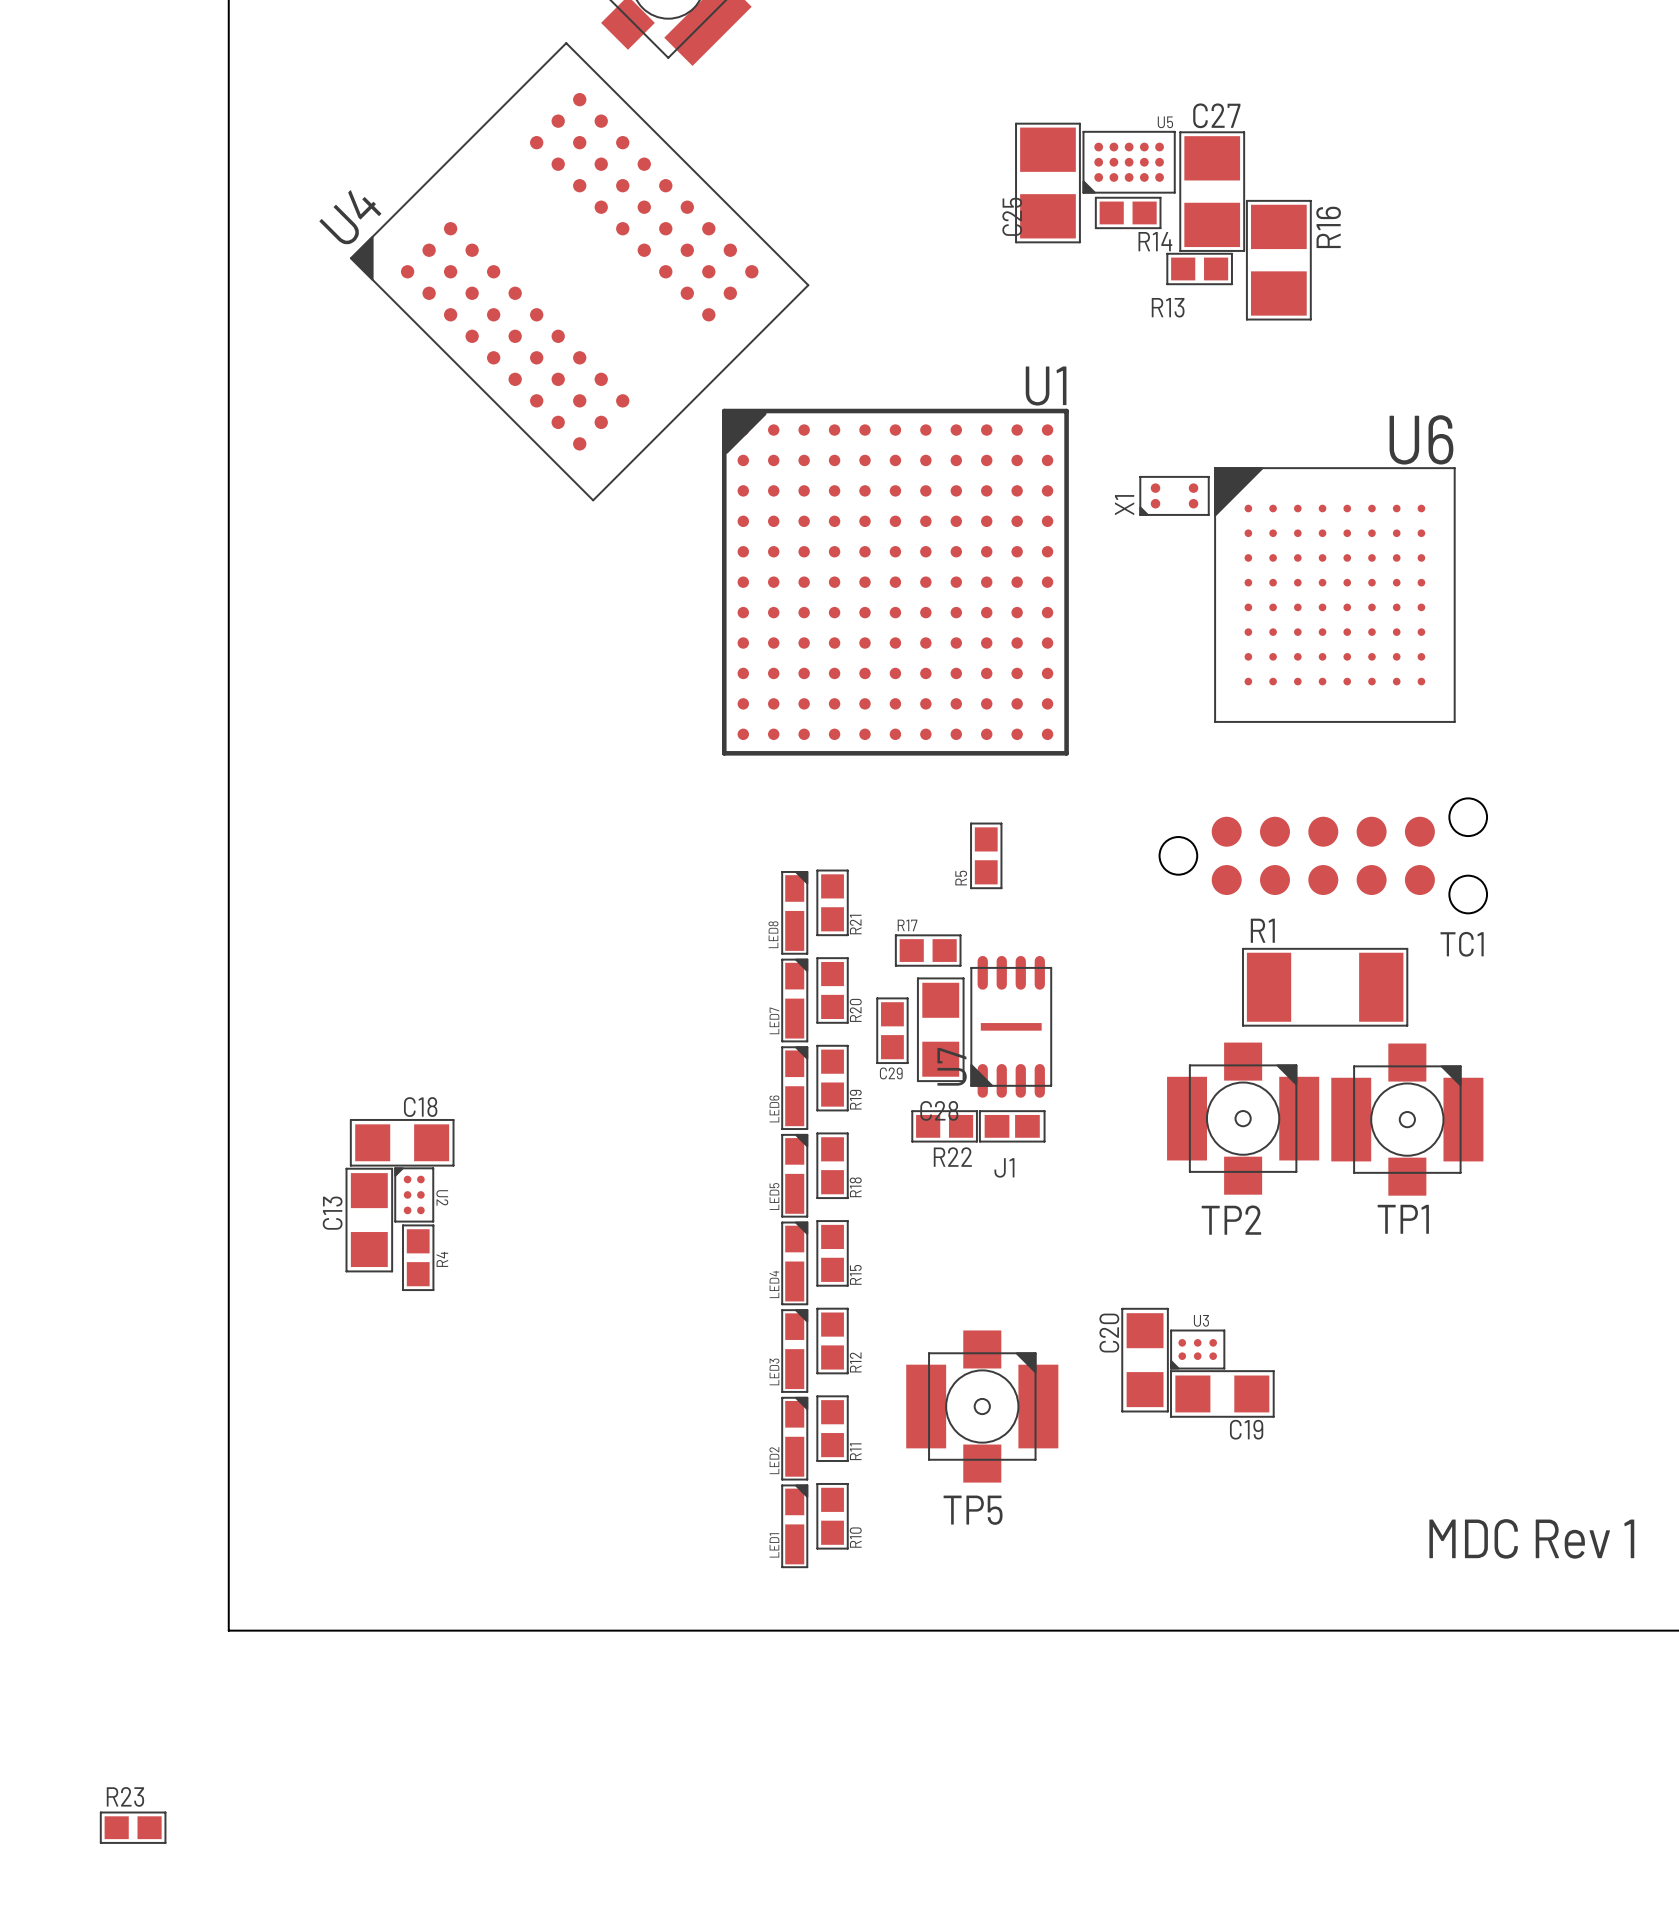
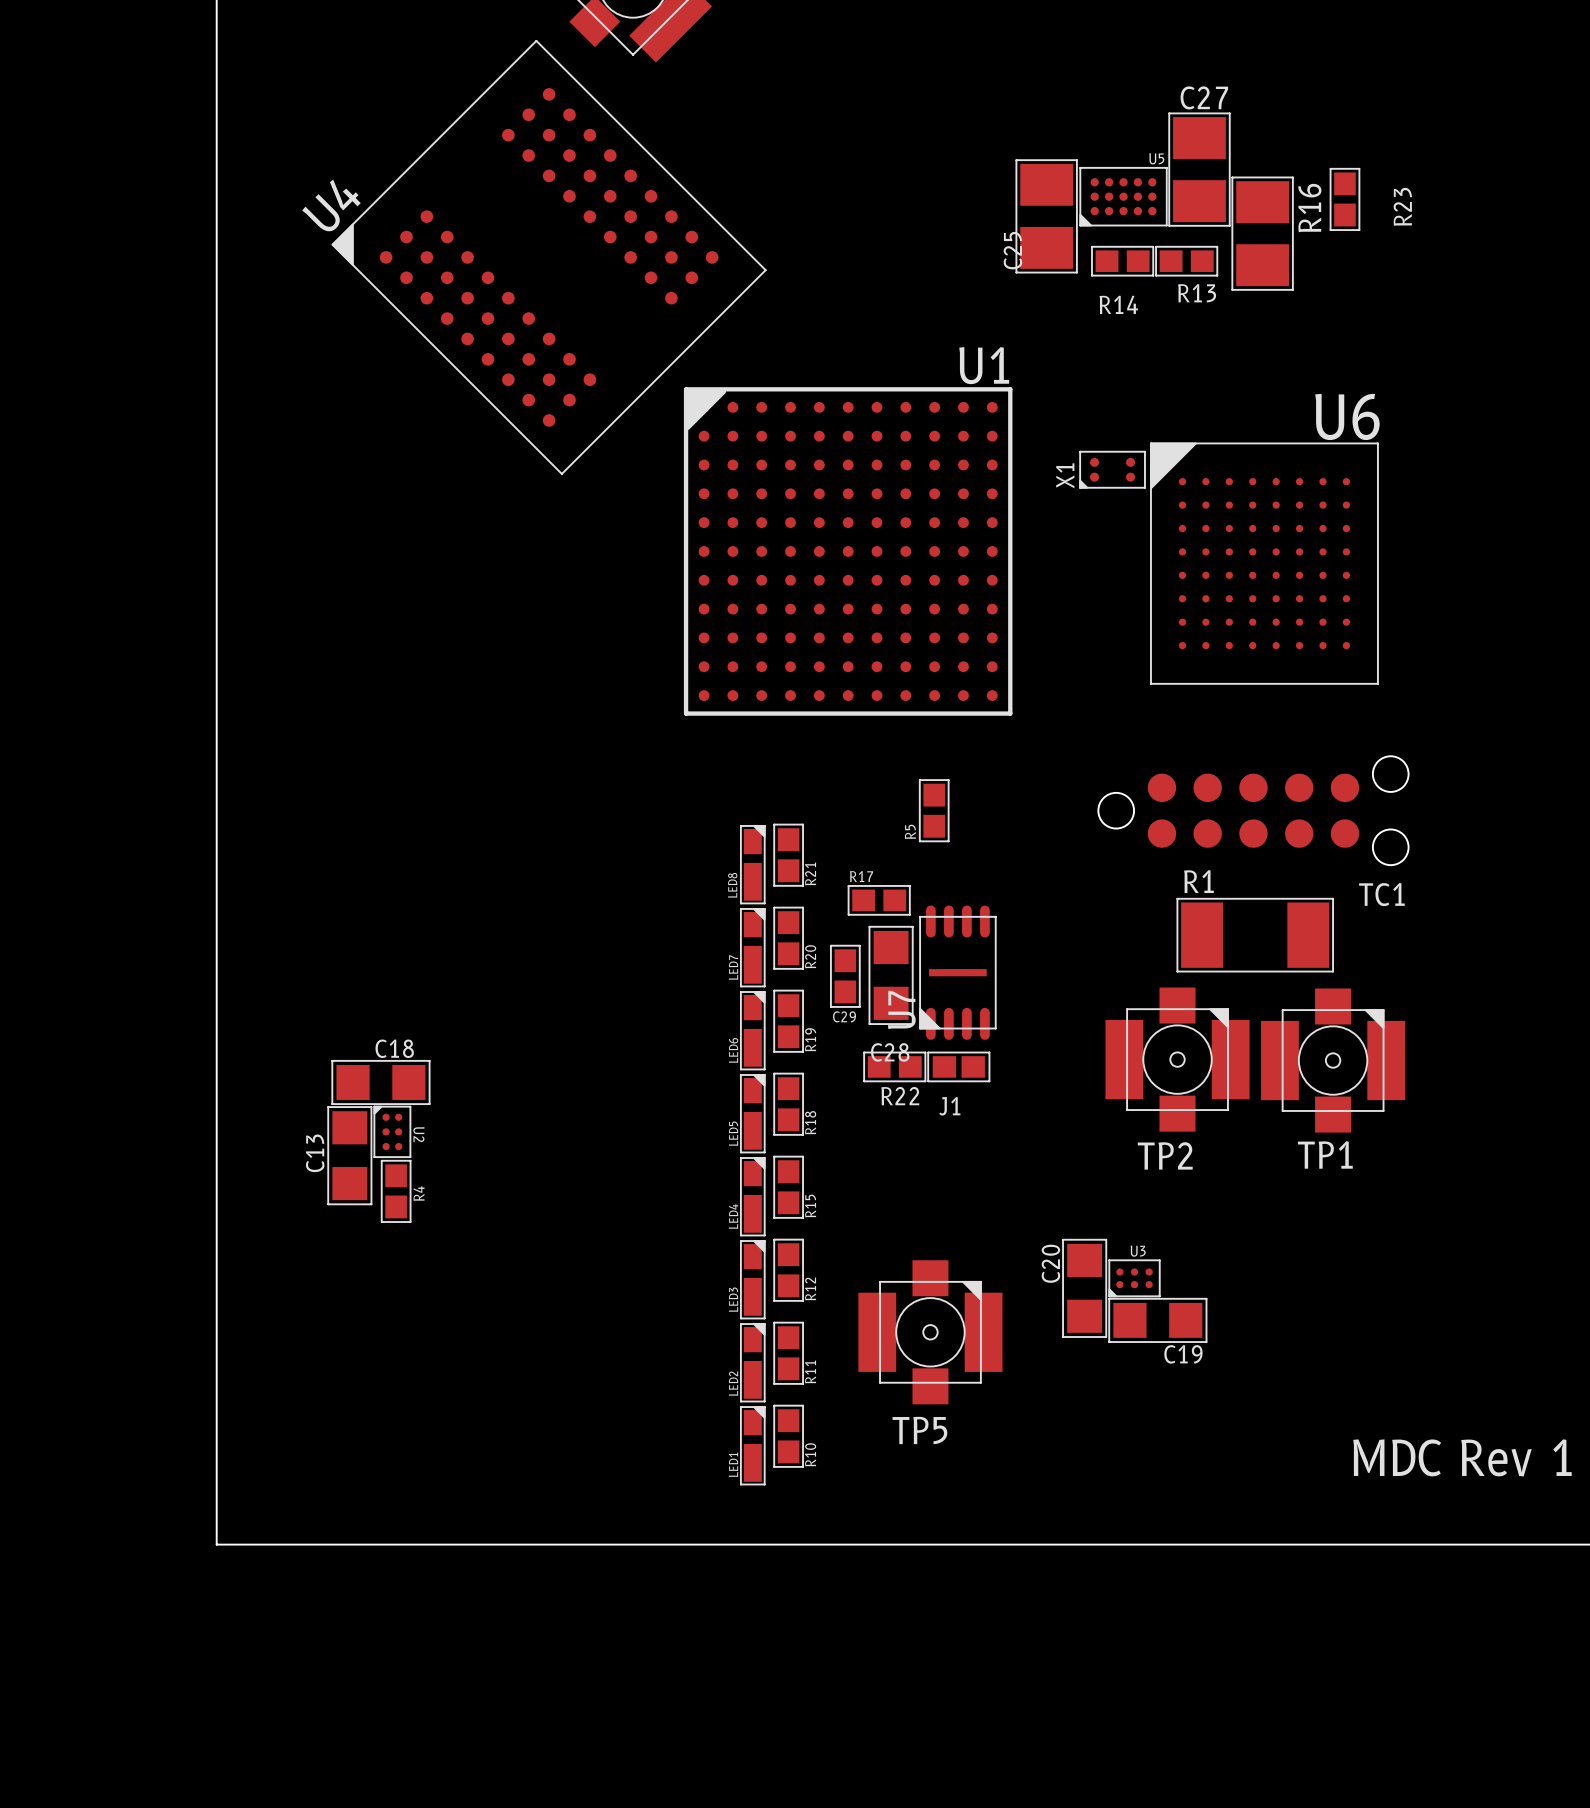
U5 position: (1129, 162) -> (1123, 196)
C25 position: (1047, 183) -> (1046, 216)
C27 position: (1212, 191) -> (1199, 169)
R14 position: (1128, 212) -> (1122, 261)
R14 name position: R14 (1155, 241) -> R14 (1118, 304)
R16 position: (1278, 260) -> (1262, 233)
R13 position: (1199, 268) -> (1186, 261)
R13 name position: R13 (1168, 307) -> R13 (1197, 293)
R23 rotation: 0° (133, 1827) -> 90° clockwise (1344, 199)
R23 position: (133, 1827) -> (1344, 199)

